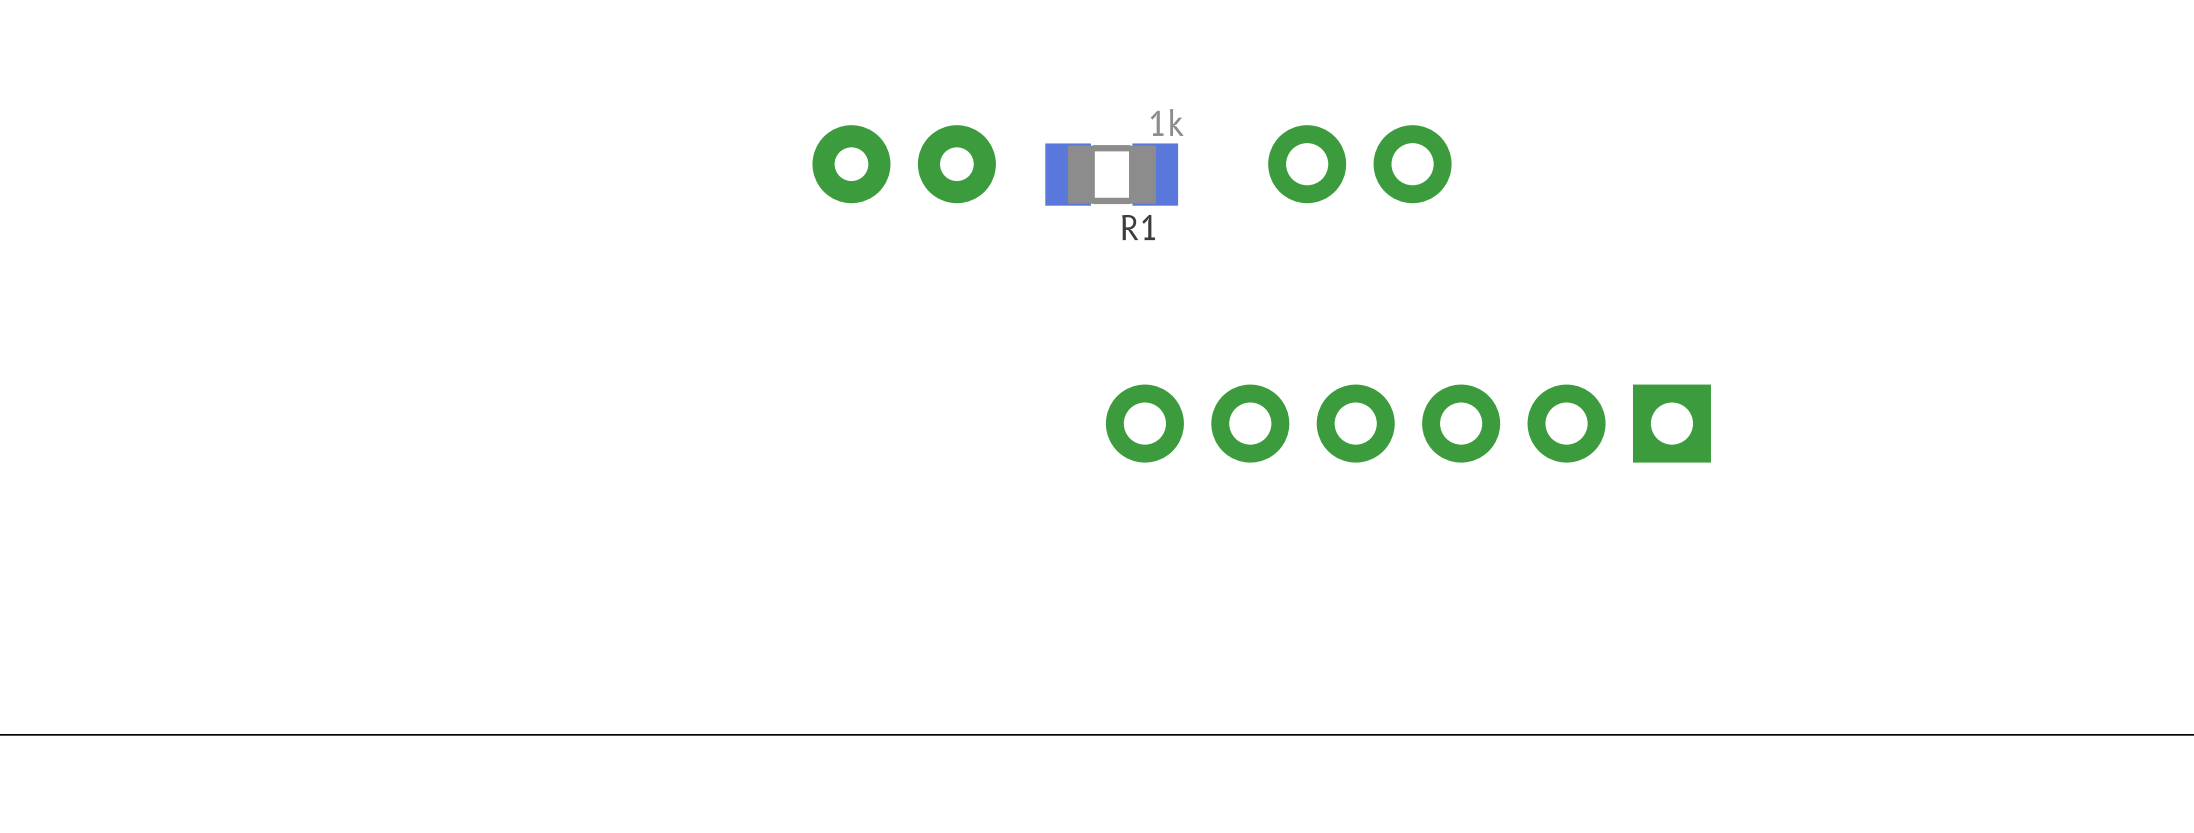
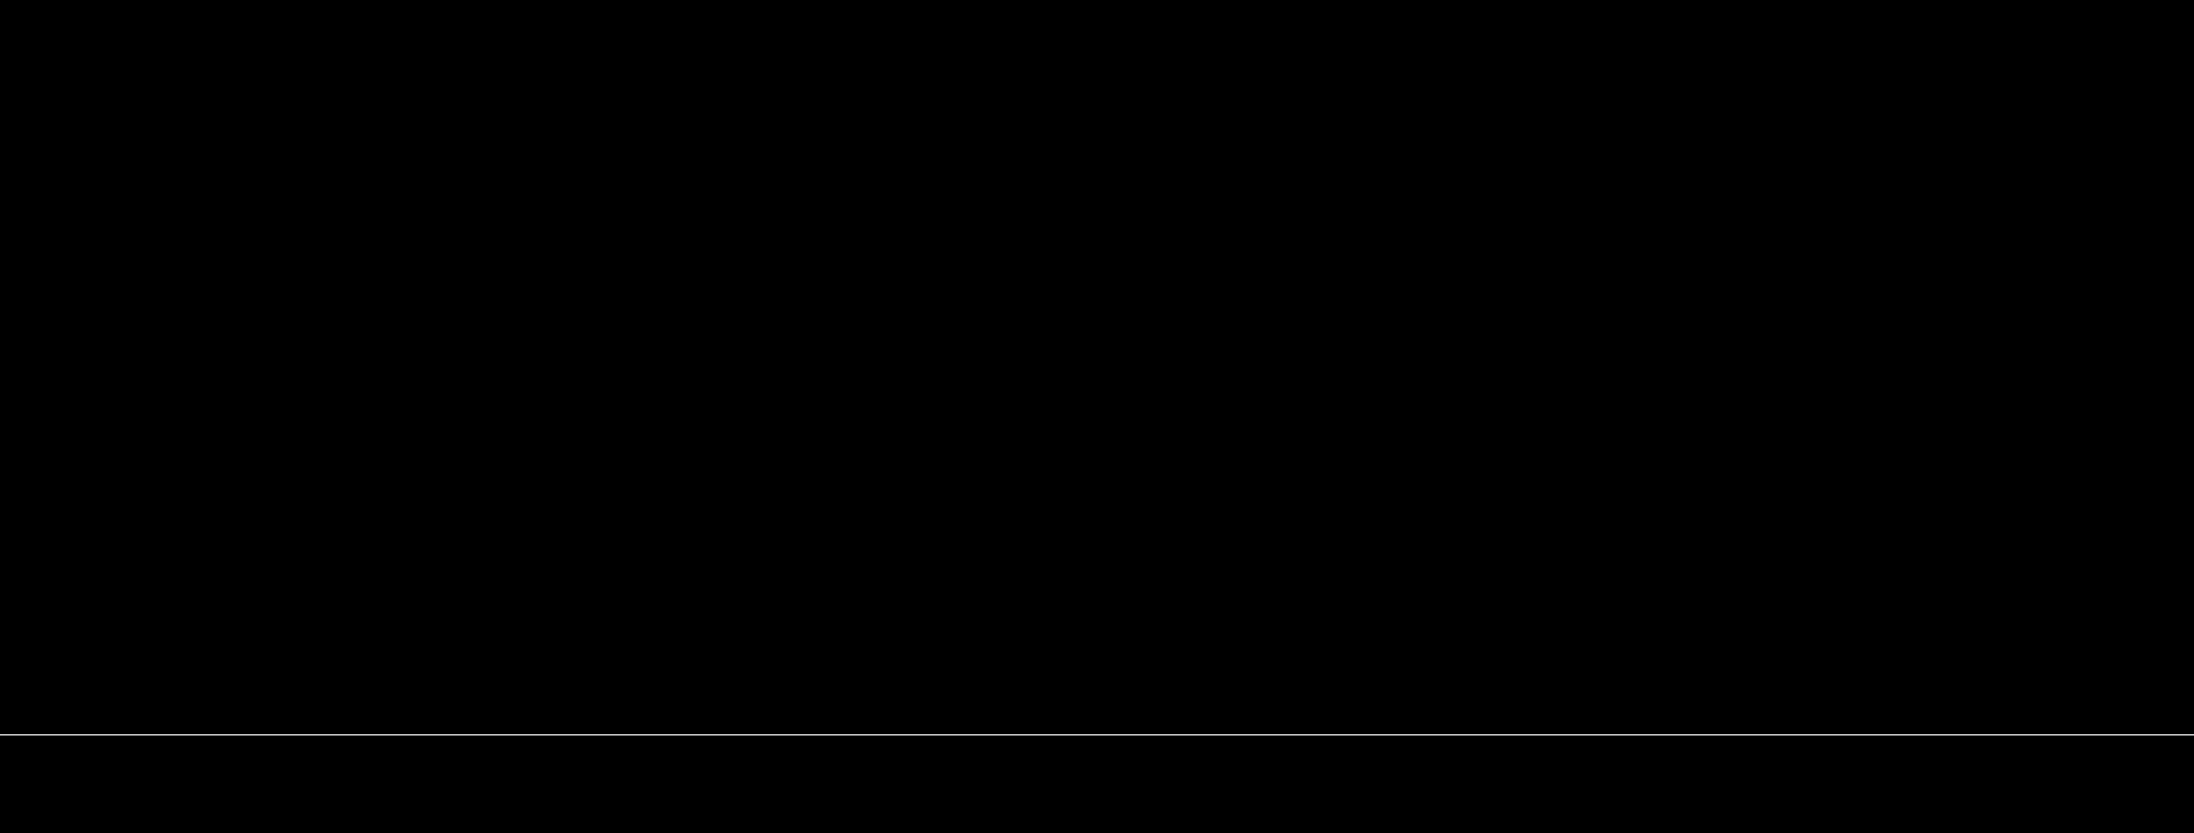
part: (904, 164) -> none
part: (1359, 164) -> none
R1: 1k (1111, 174) -> none
part: (1408, 423) -> none

